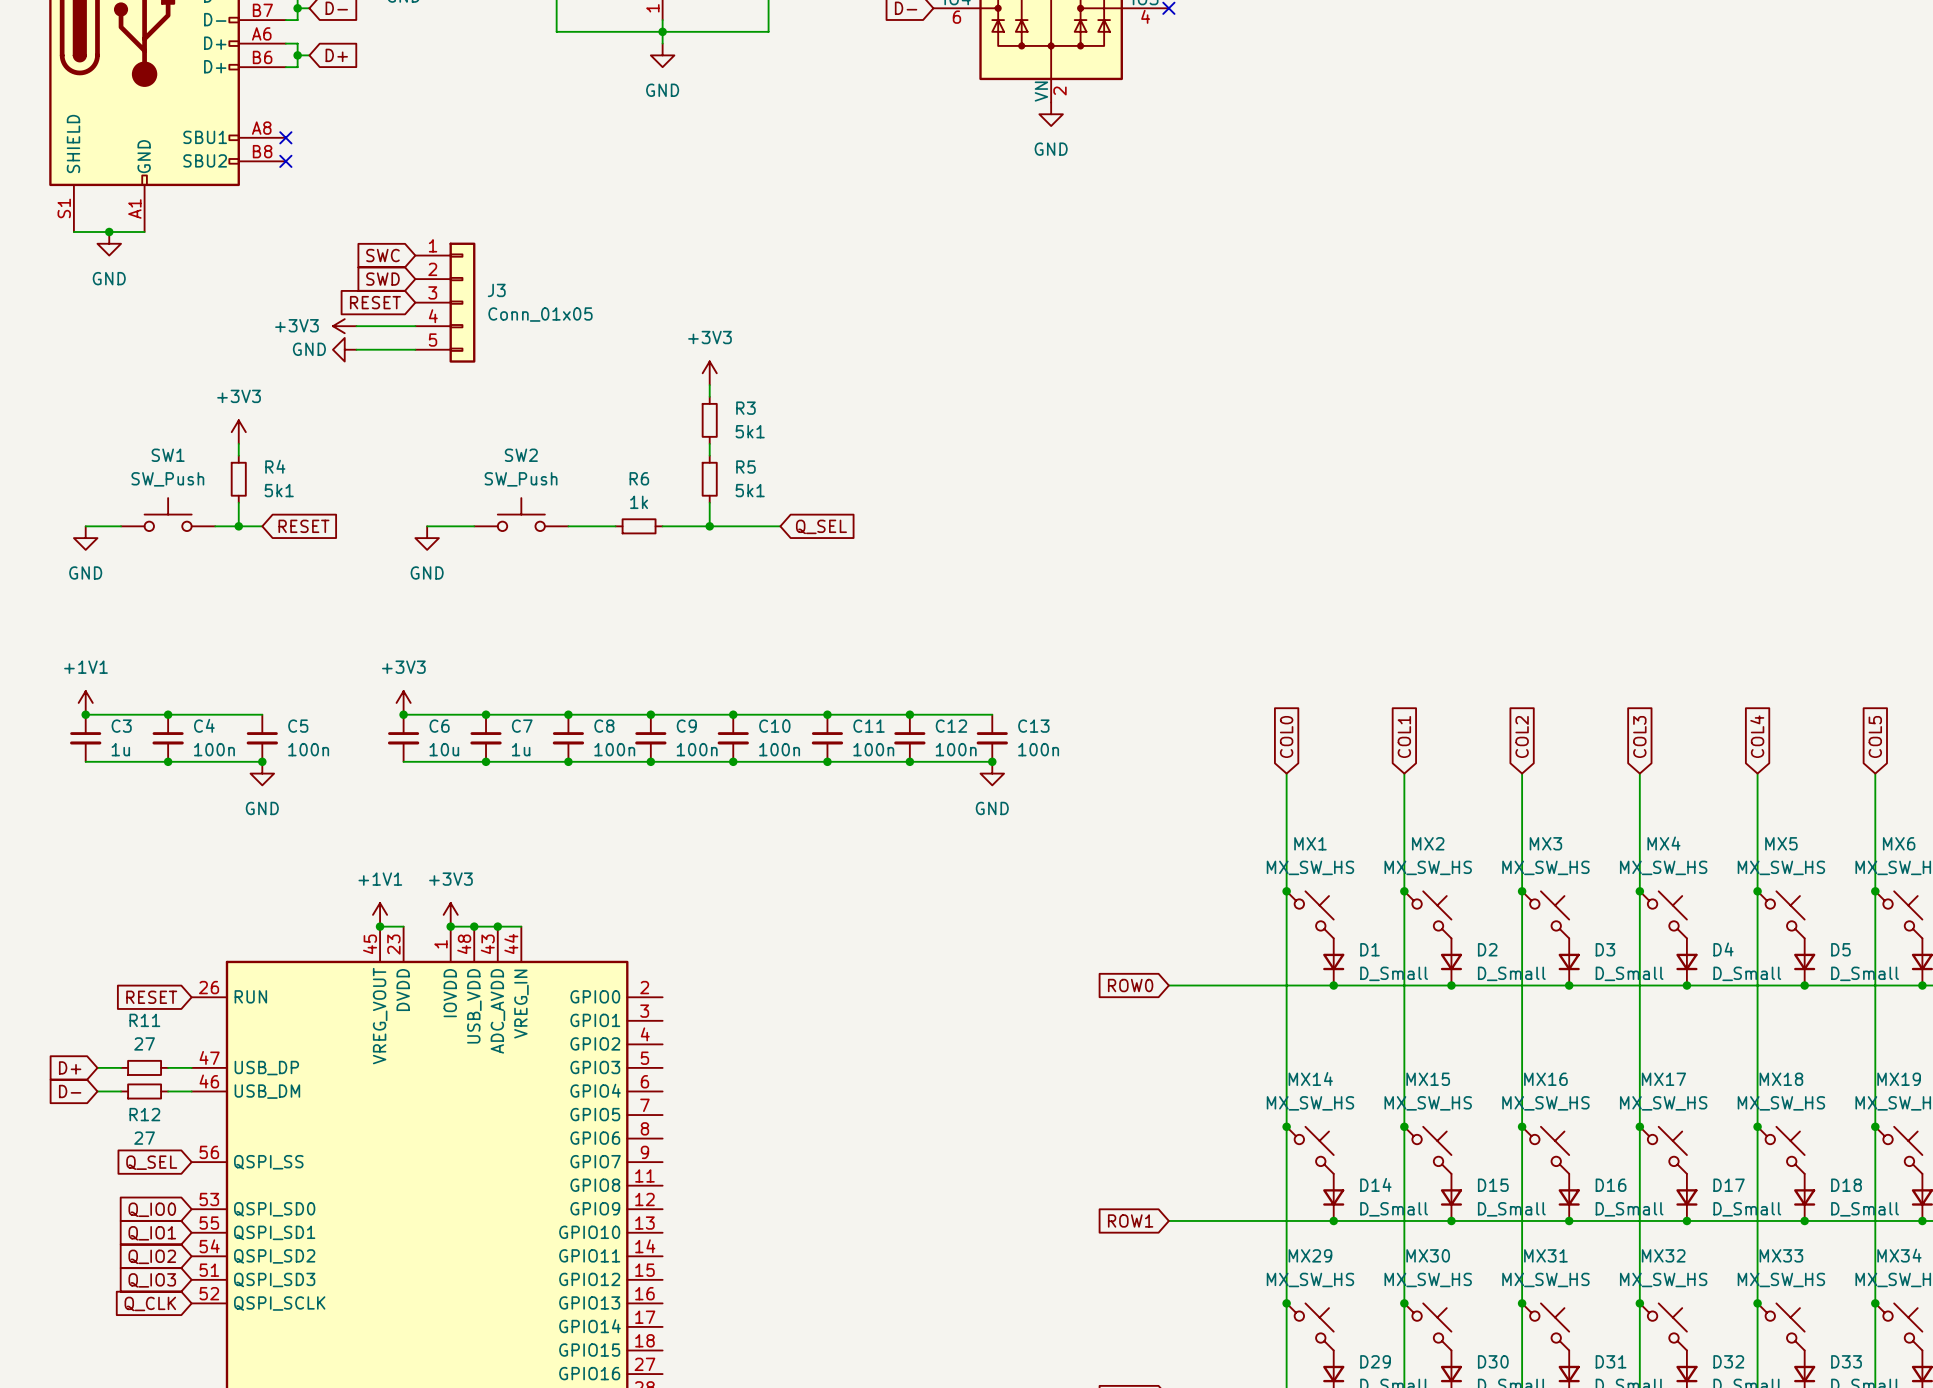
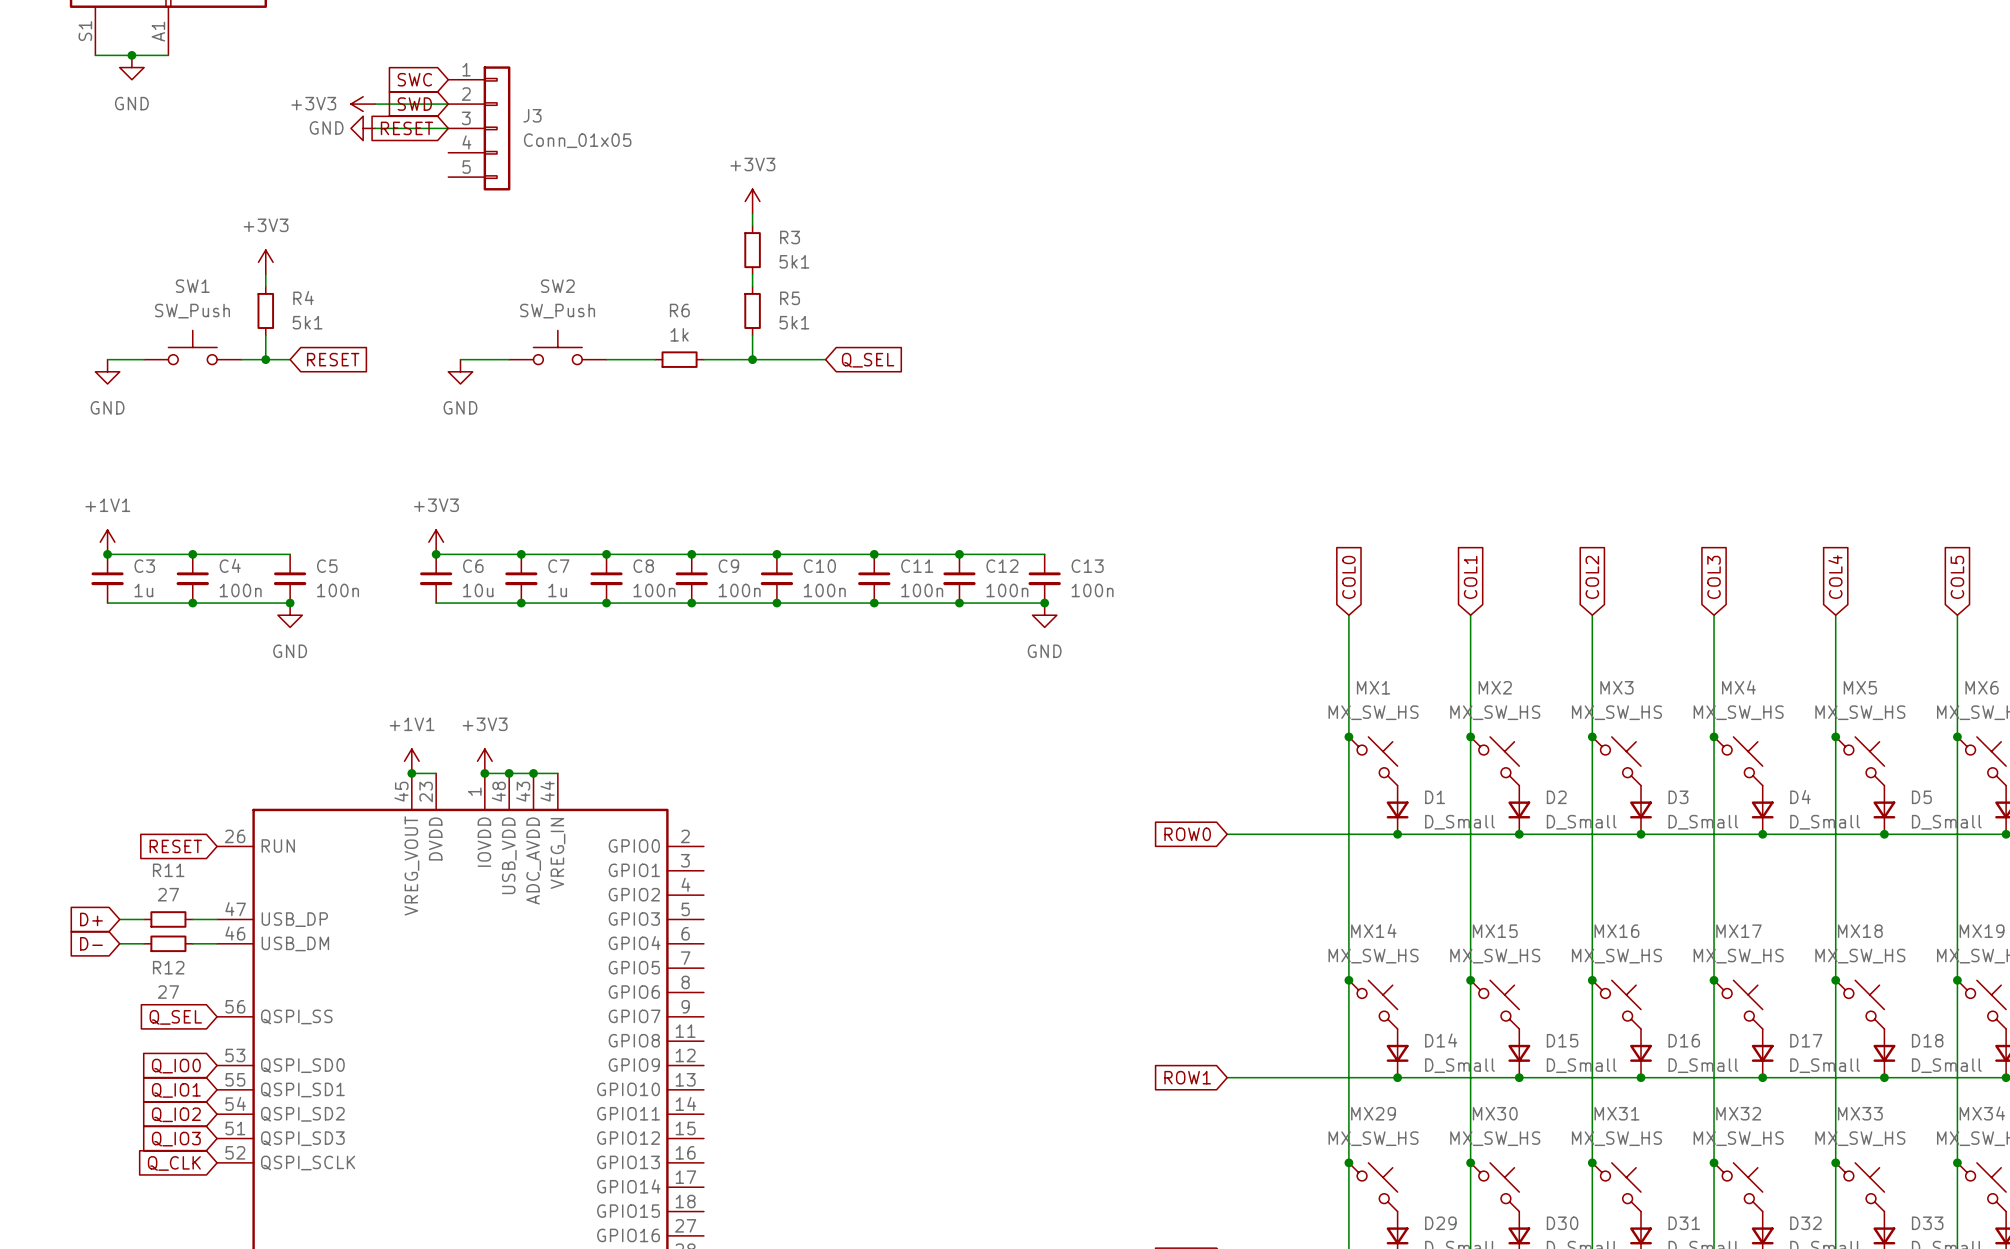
wire: none -> (375, 104) (448, 104)
wire: none -> (375, 128) (448, 128)
power symbol position: +3V3 (344, 326) -> +3V3 (363, 104)
wire: (356, 326) (415, 326) -> none
power symbol position: GND (344, 349) -> GND (363, 128)
wire: (356, 349) (415, 349) -> none

